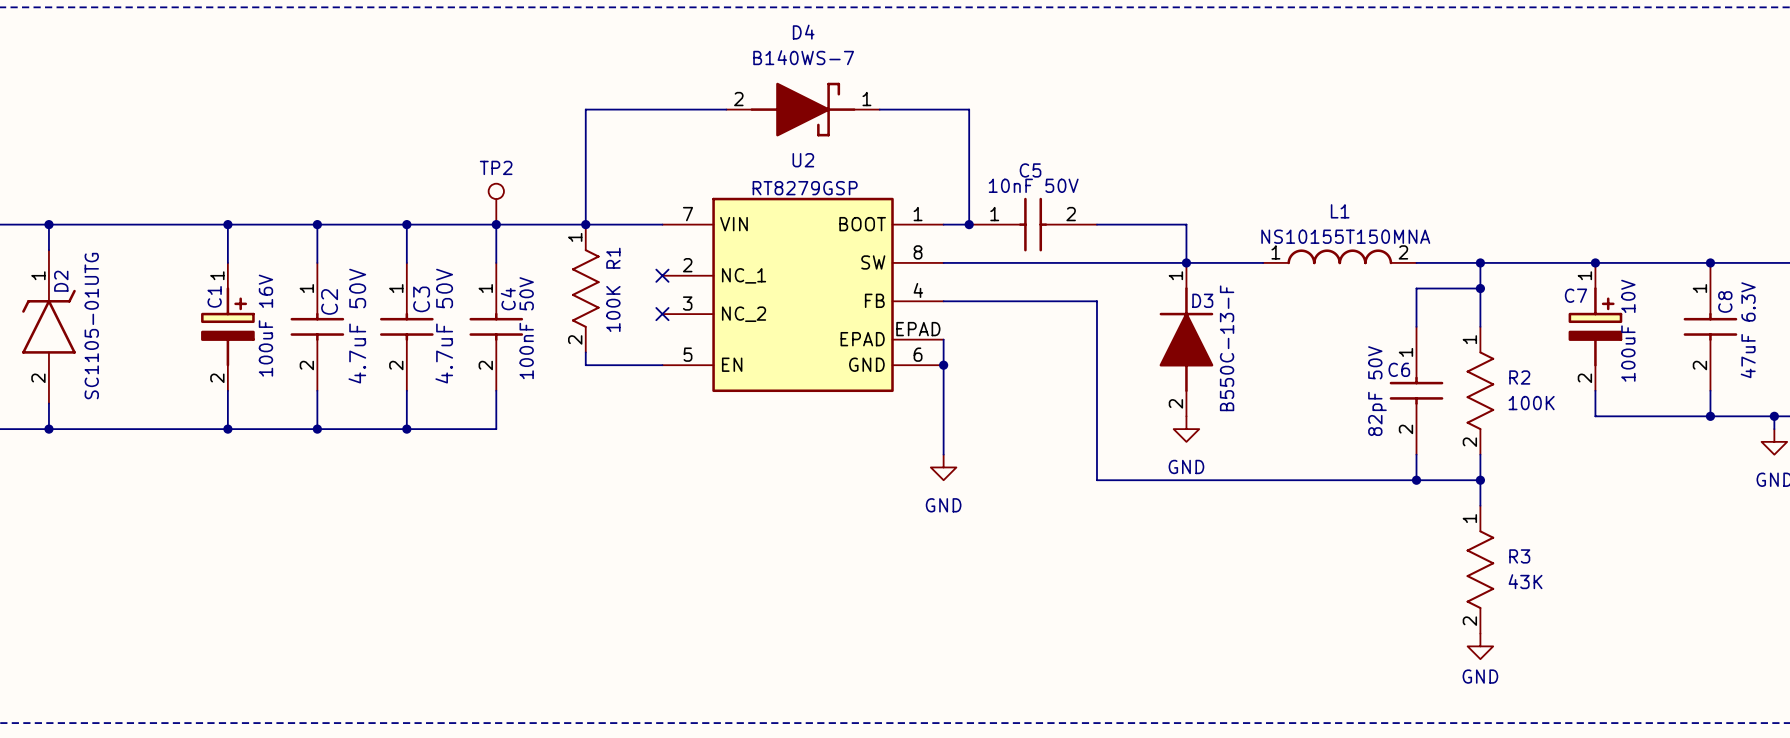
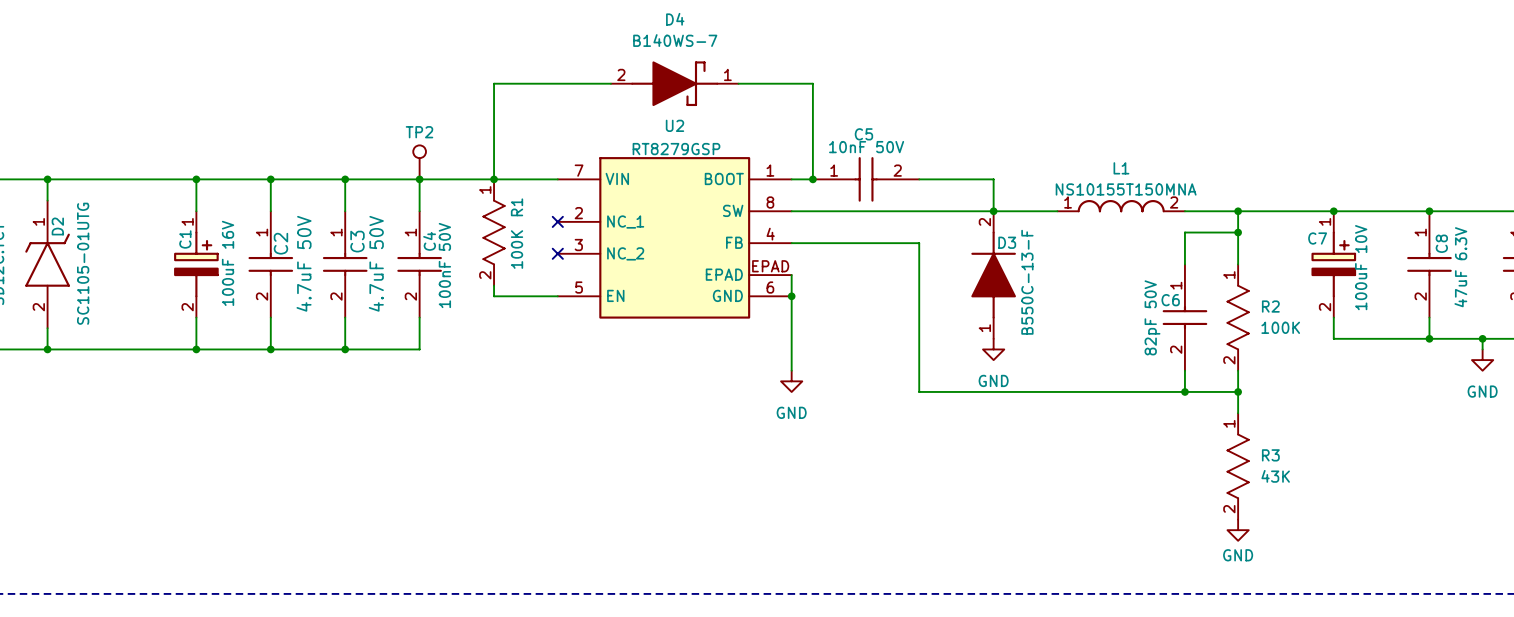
D3 pin number: 1 (1175, 275) -> 2 (984, 222)
D3 pin number: 2 (1175, 403) -> 1 (984, 328)

